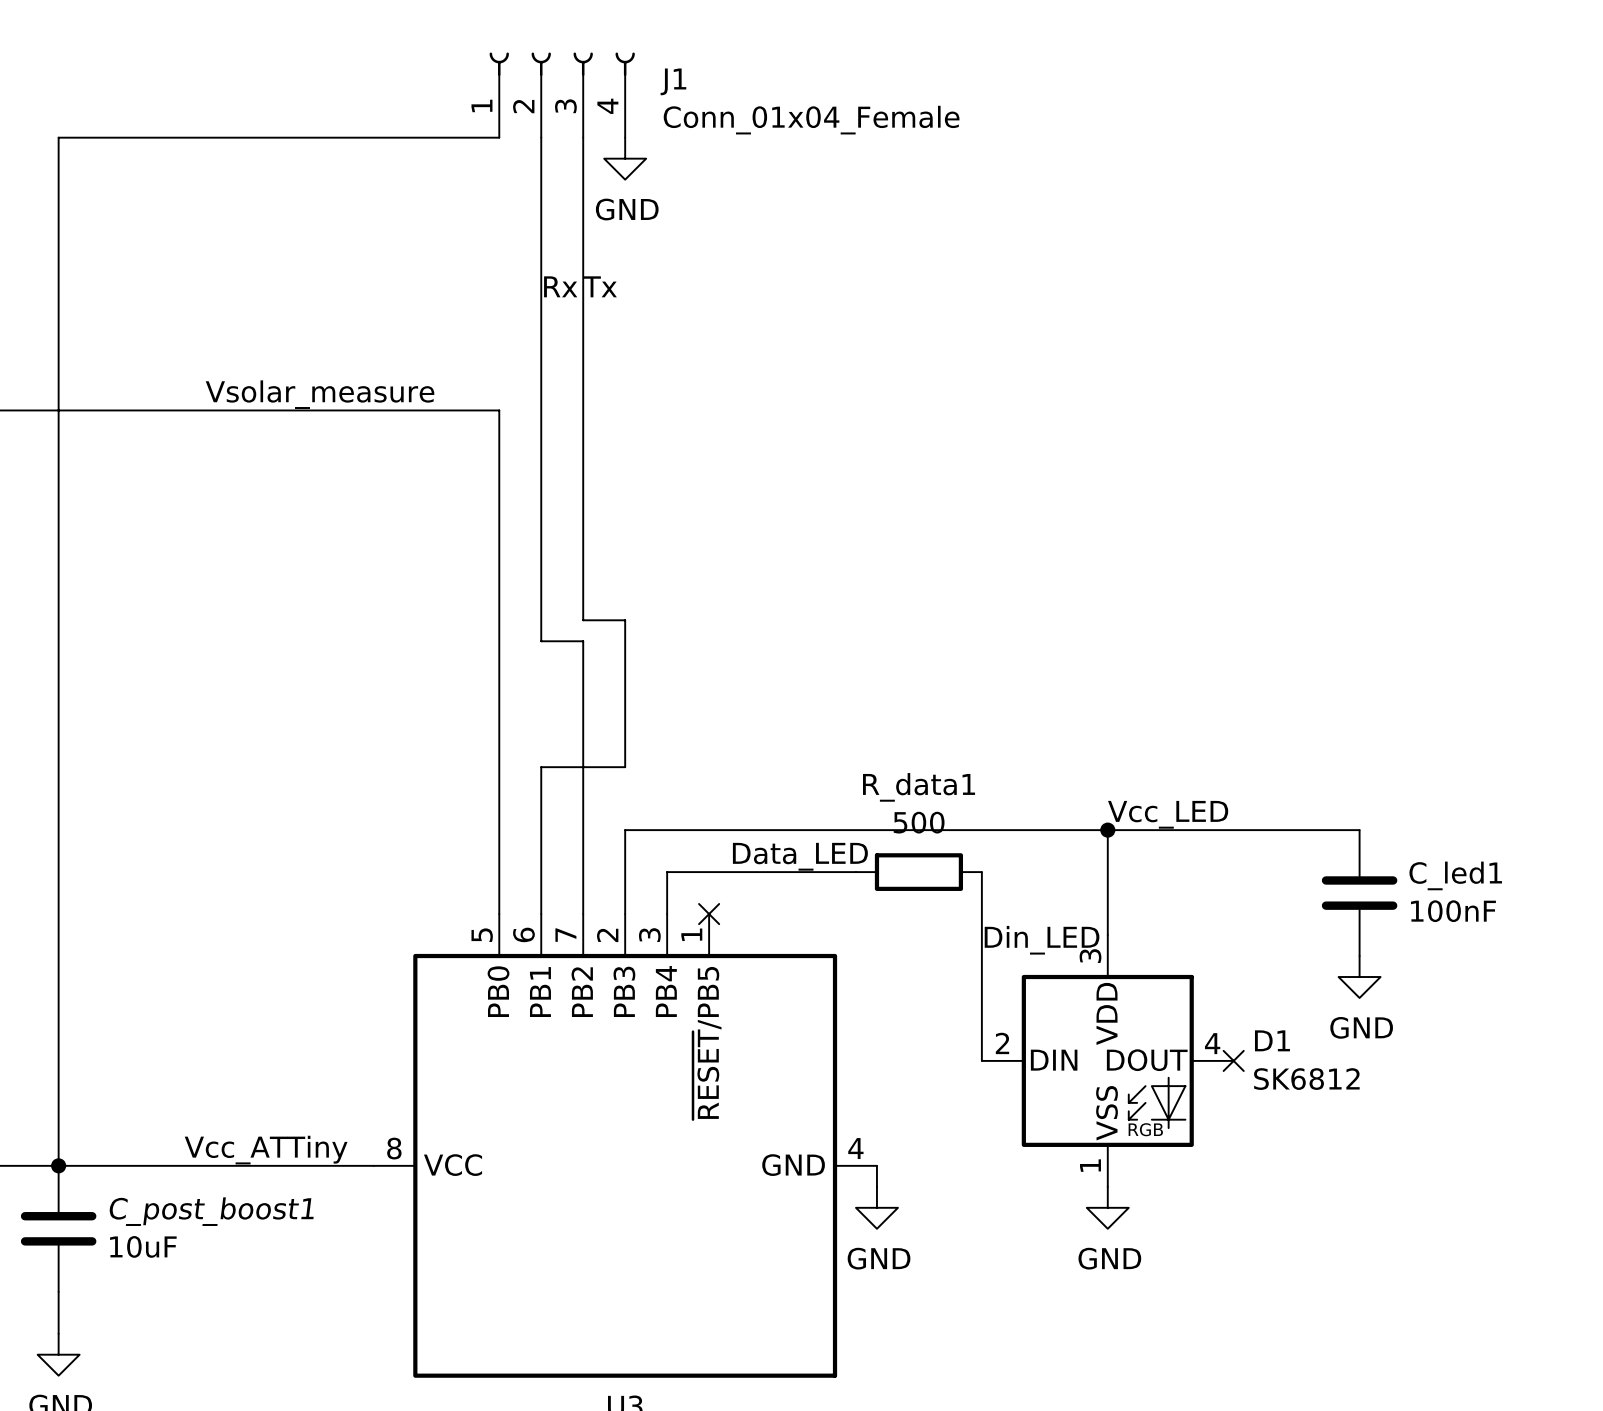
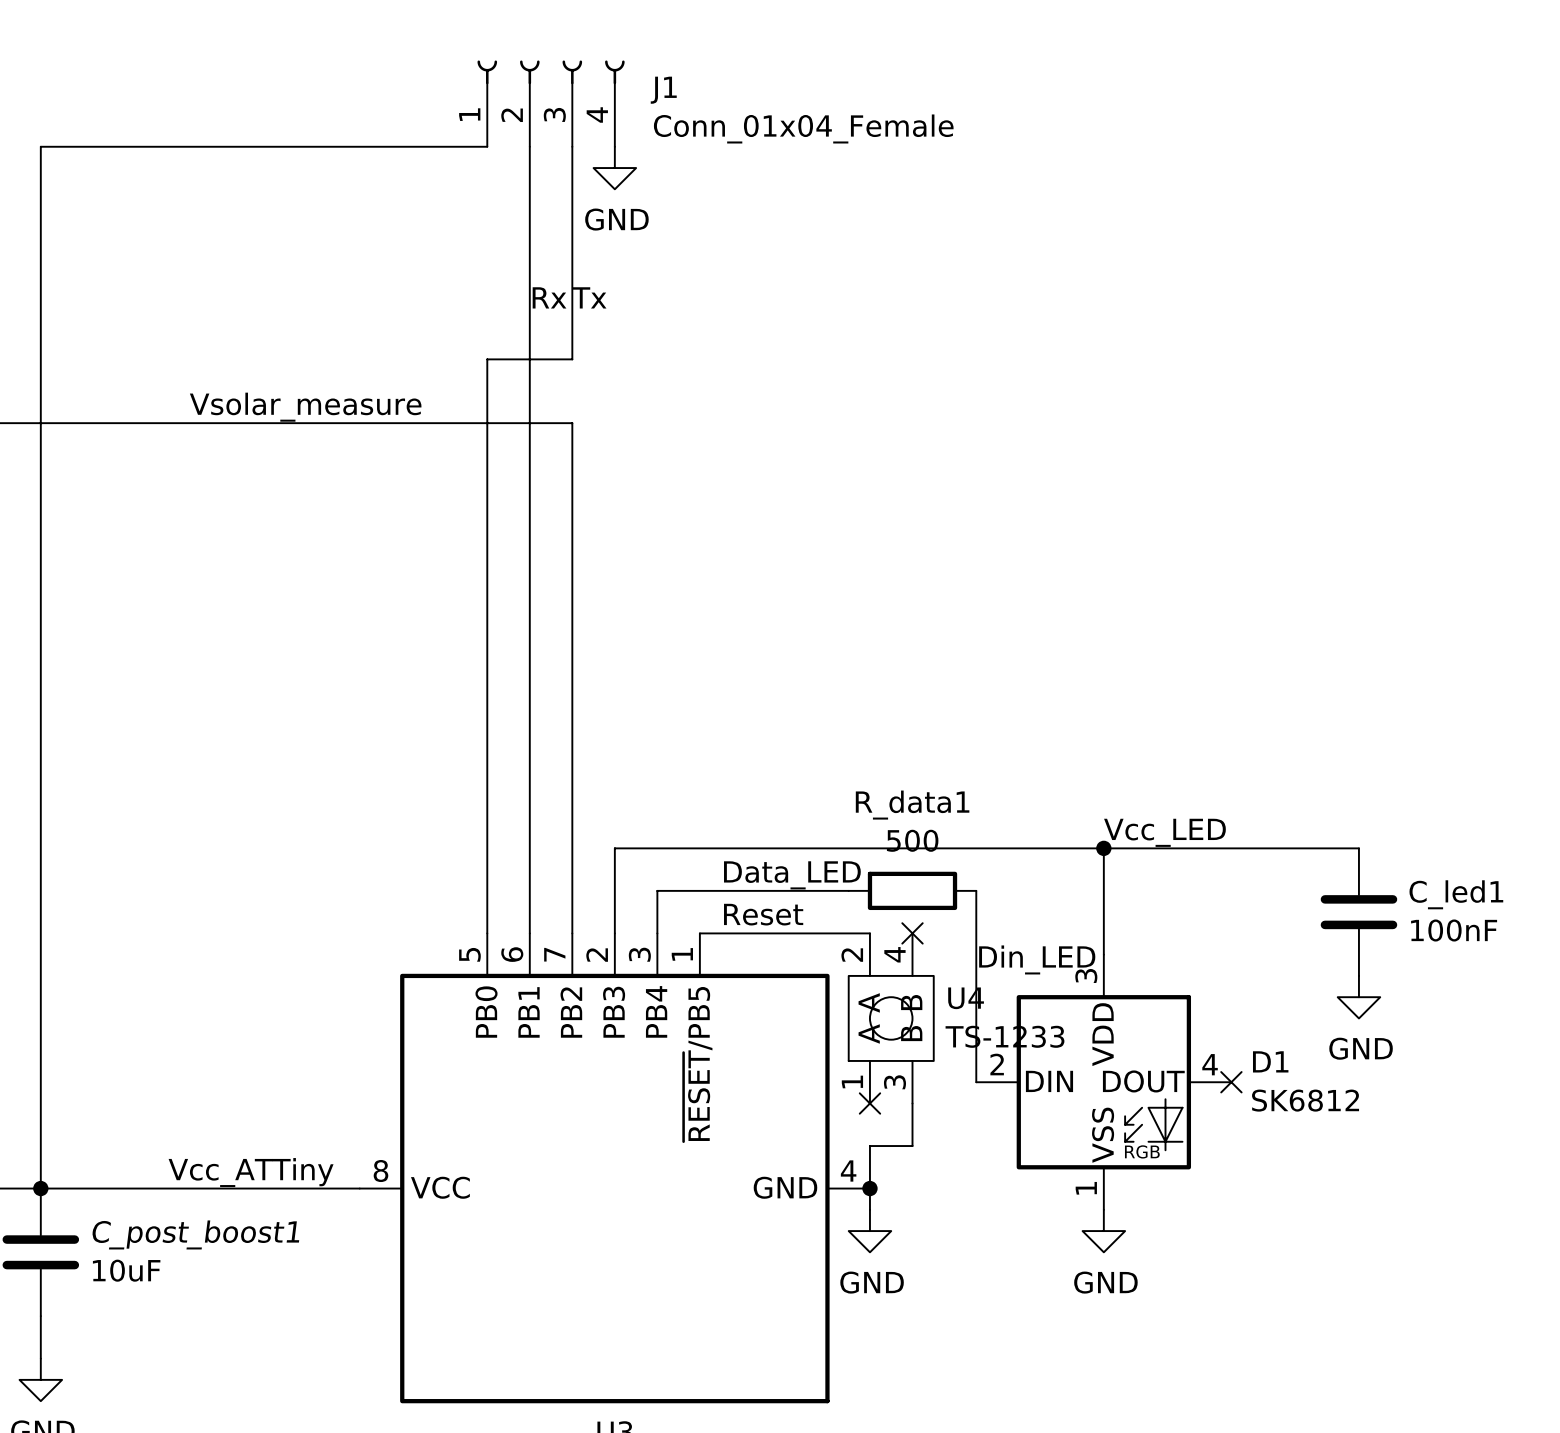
wire: (583, 347) (583, 410) -> (572, 359) (487, 359) (487, 423) (572, 423)
wire: (583, 620) (625, 620) (625, 767) (541, 767) -> (529, 657) (529, 784)
wire: (541, 641) (583, 641) -> (572, 635) (572, 657)
label: none -> Reset (763, 914)
wire: none -> (699, 933) (869, 933)
no-connect mark: (709, 914) -> none
no-connect mark: none -> (912, 933)
U4: none -> TS-1233 (891, 1018)
no-connect mark: none -> (869, 1103)
wire: none -> (912, 1103) (912, 1146) (869, 1146) (869, 1188)
junction: none -> (869, 1188)

